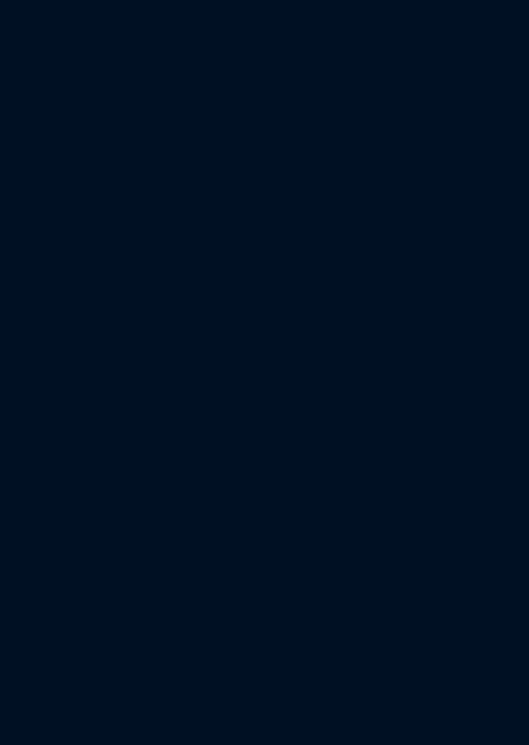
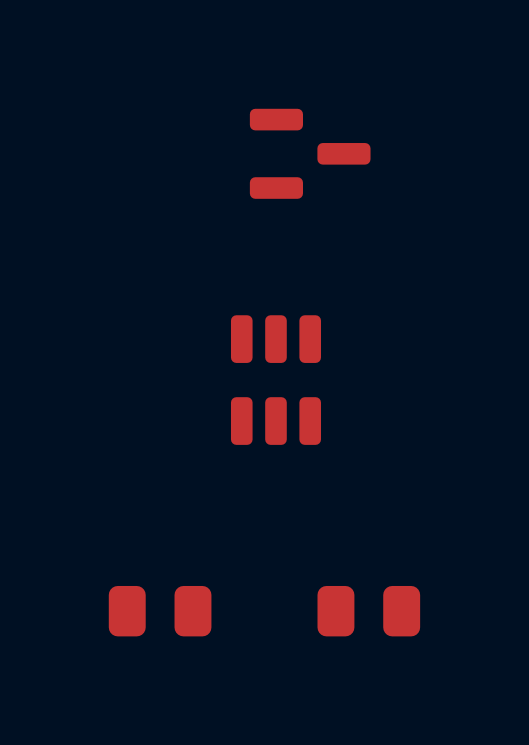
part: none -> (310, 153)
part: none -> (275, 380)
part: none -> (160, 611)
part: none -> (368, 611)

